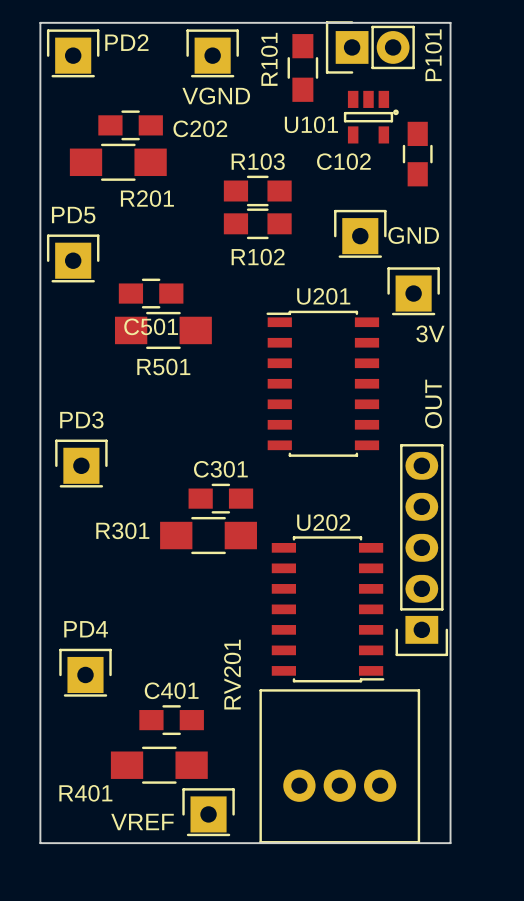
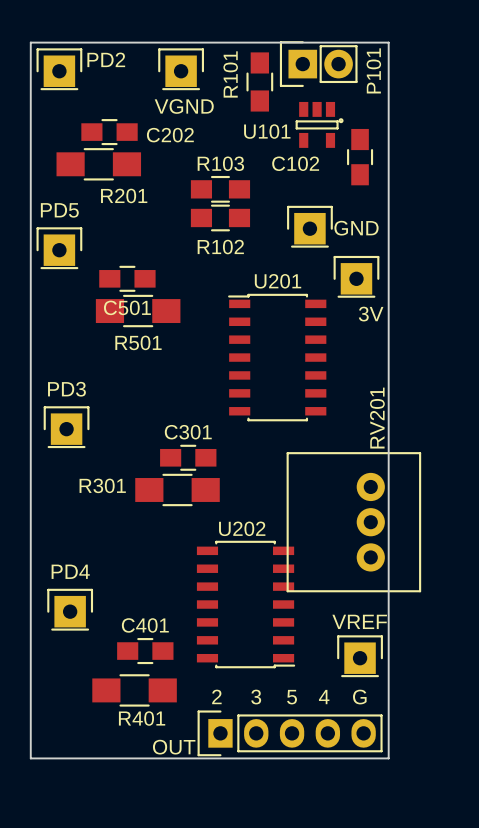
text: OUT (433, 403) -> none
part rotation: 0° (421, 550) -> 90° clockwise (290, 733)
part position: (421, 550) -> (290, 733)
U202 position: (328, 609) -> (246, 604)
RV201 name position: RV201 (232, 674) -> RV201 (377, 418)
RV201 rotation: 0° (339, 766) -> 90° counterclockwise (353, 522)
RV201 position: (339, 766) -> (353, 522)
text: none -> 2 (216, 696)
text: none -> 3 (256, 697)
text: none -> 5 (292, 697)
text: none -> 4 (324, 697)
text: none -> G (359, 697)
R401 name position: R401 (85, 793) -> R401 (142, 718)
part position: (208, 812) -> (360, 656)
text position: VREF (142, 822) -> VREF (359, 621)
text: none -> OUT (174, 747)

